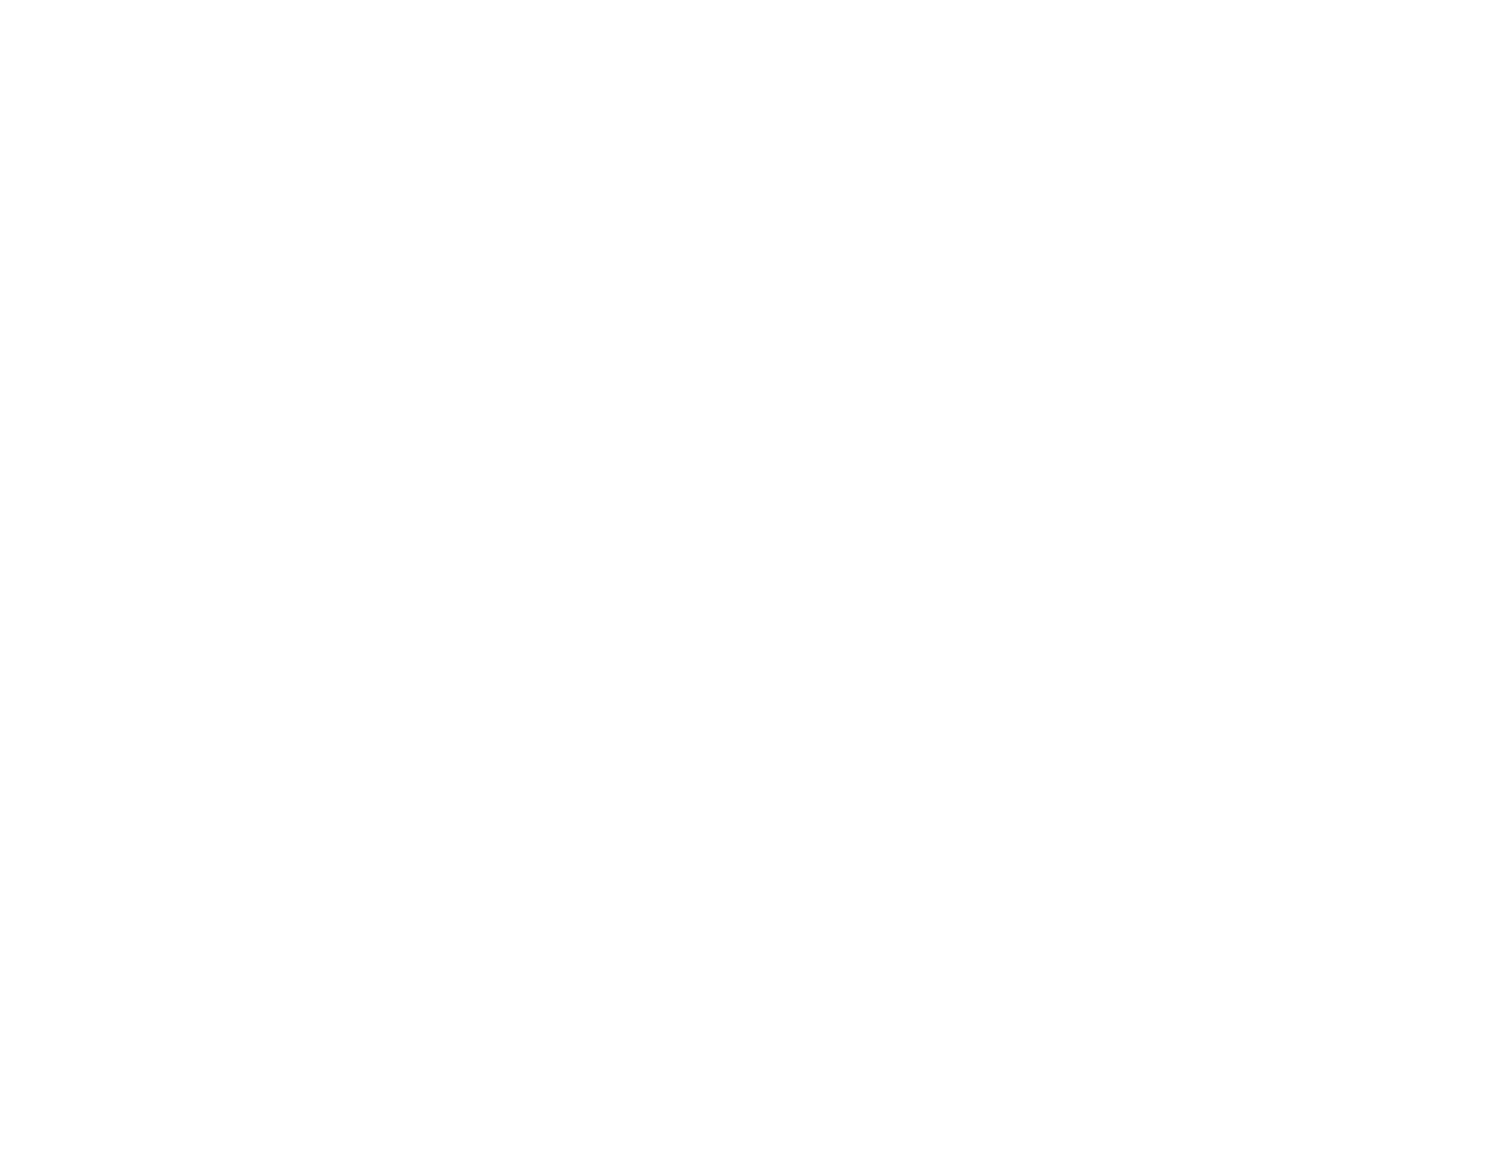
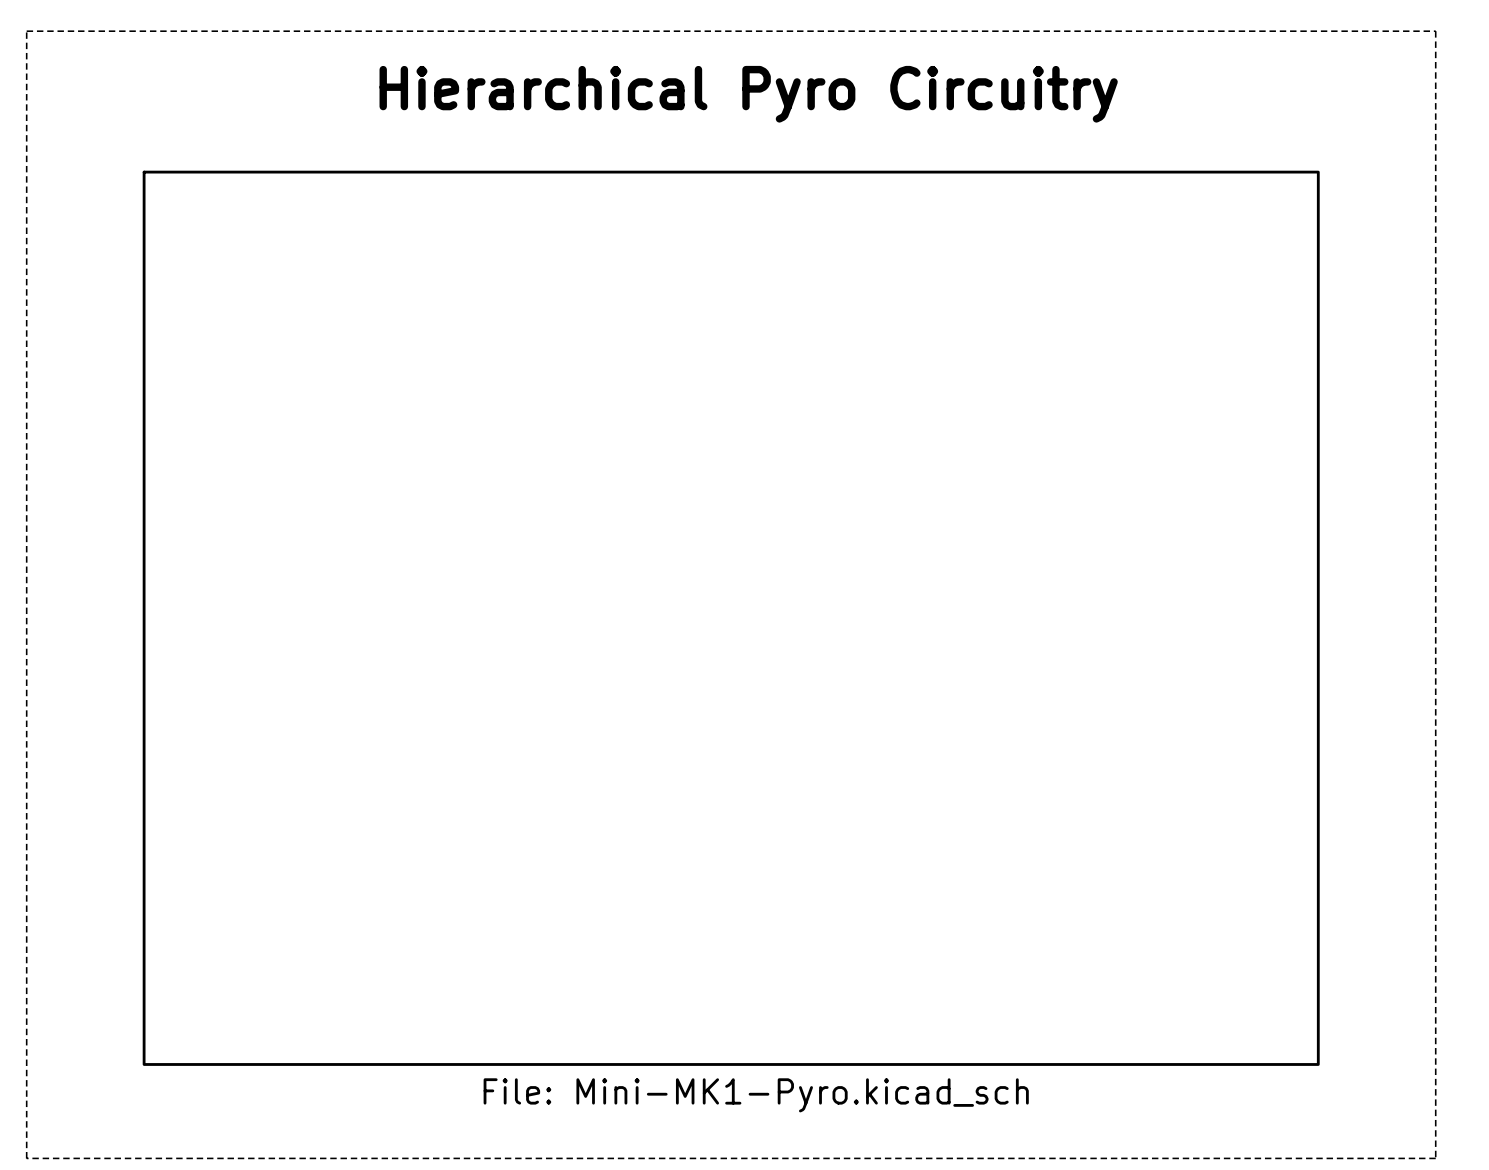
line: none -> (26, 31) (1435, 31) (1435, 1158) (26, 1158) (26, 31)
text: none -> Hierarchical Pyro Circuitry (748, 94)
sheet: none -> File: Mini-MK1-Pyro.kicad_sch (731, 618)

